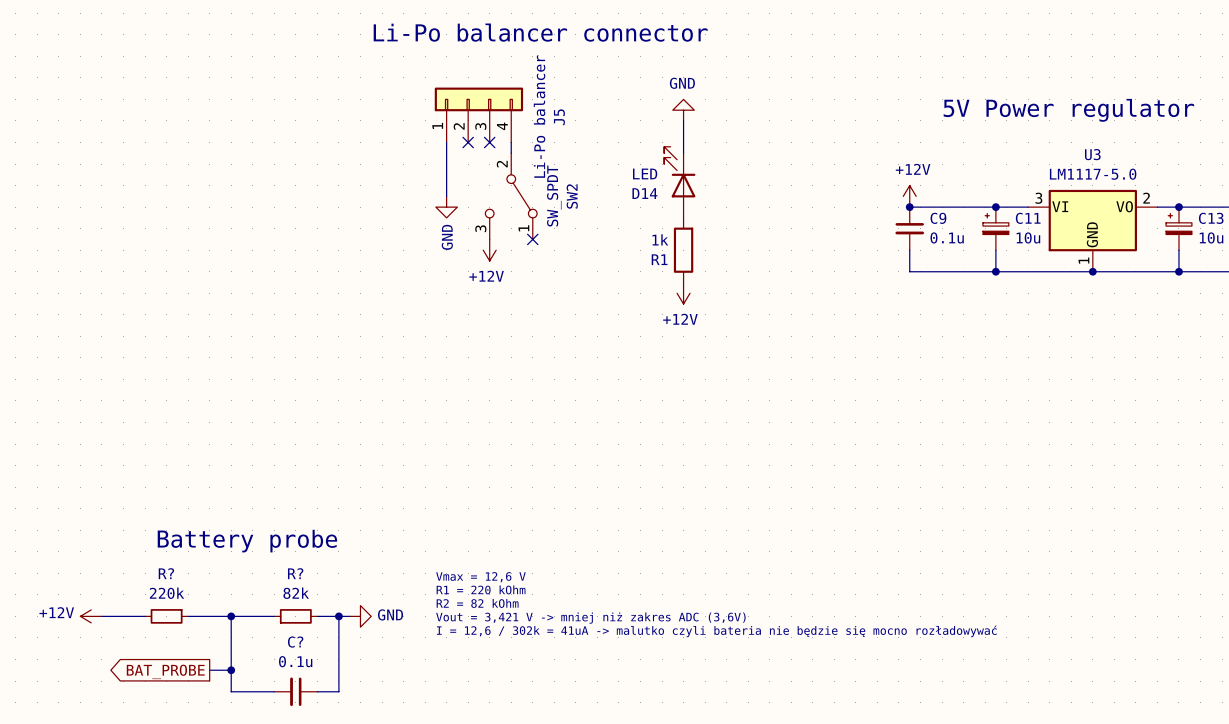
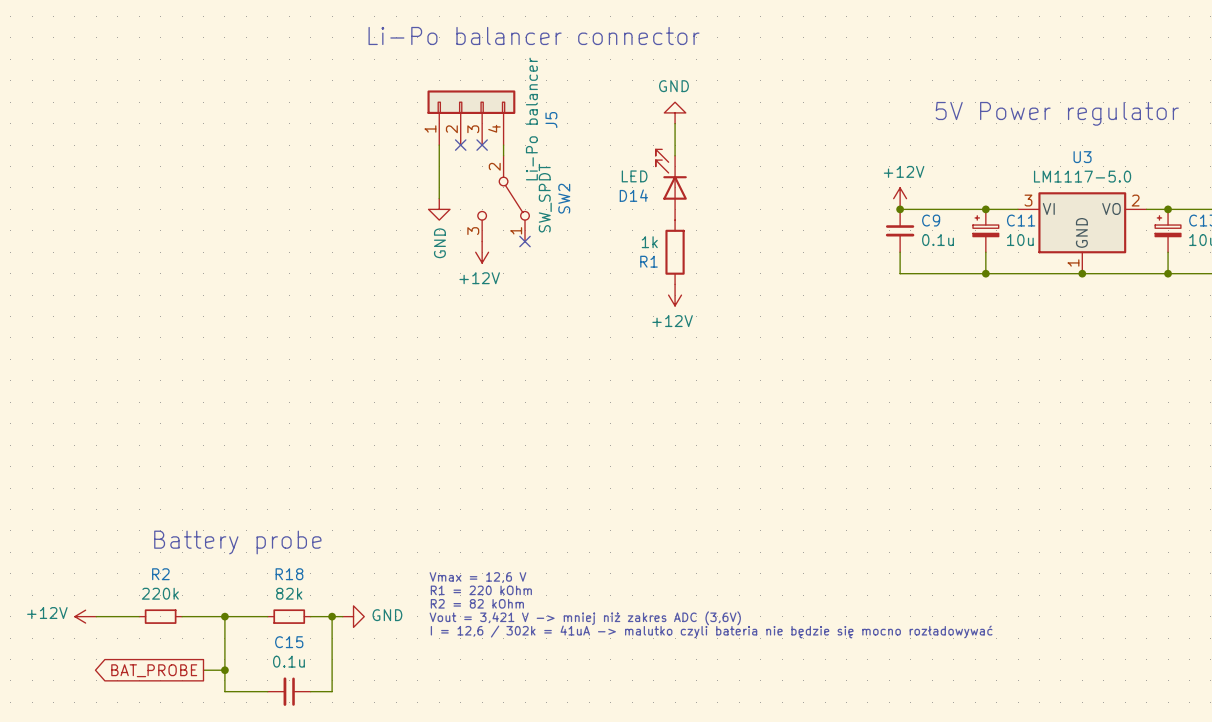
R? name: R? (166, 573) -> R2 (160, 574)
R? name: R? (295, 573) -> R18 (289, 574)
C? name: C? (295, 642) -> C15 (289, 642)

